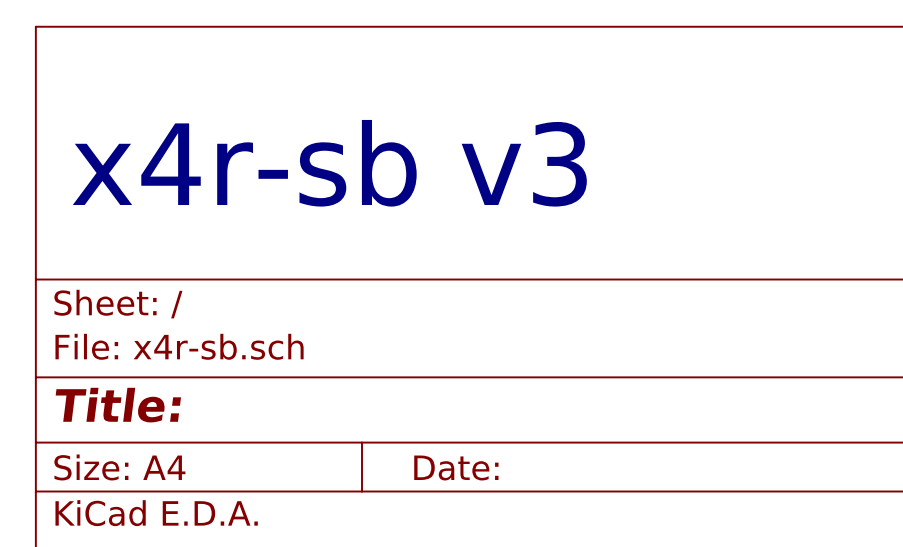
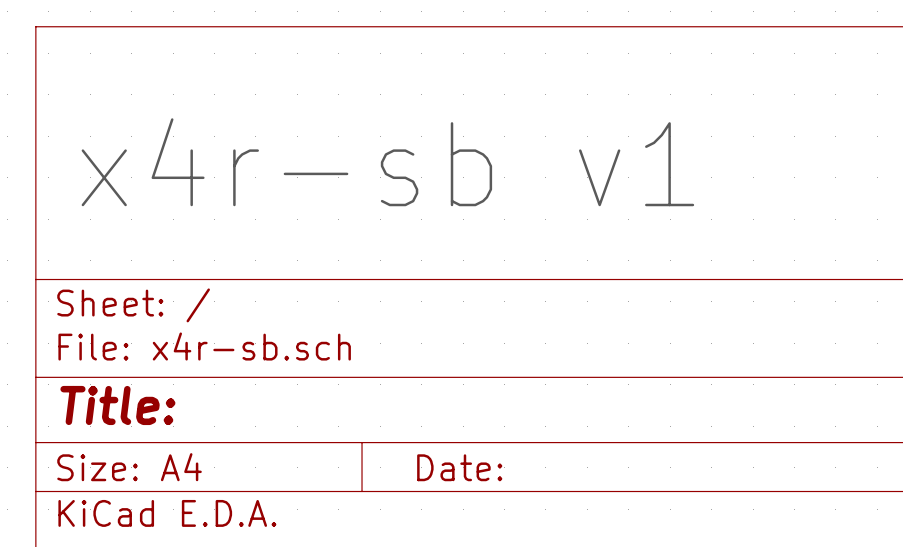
text: x4r-sb v3 (329, 163) -> x4r-sb v1 (387, 162)

